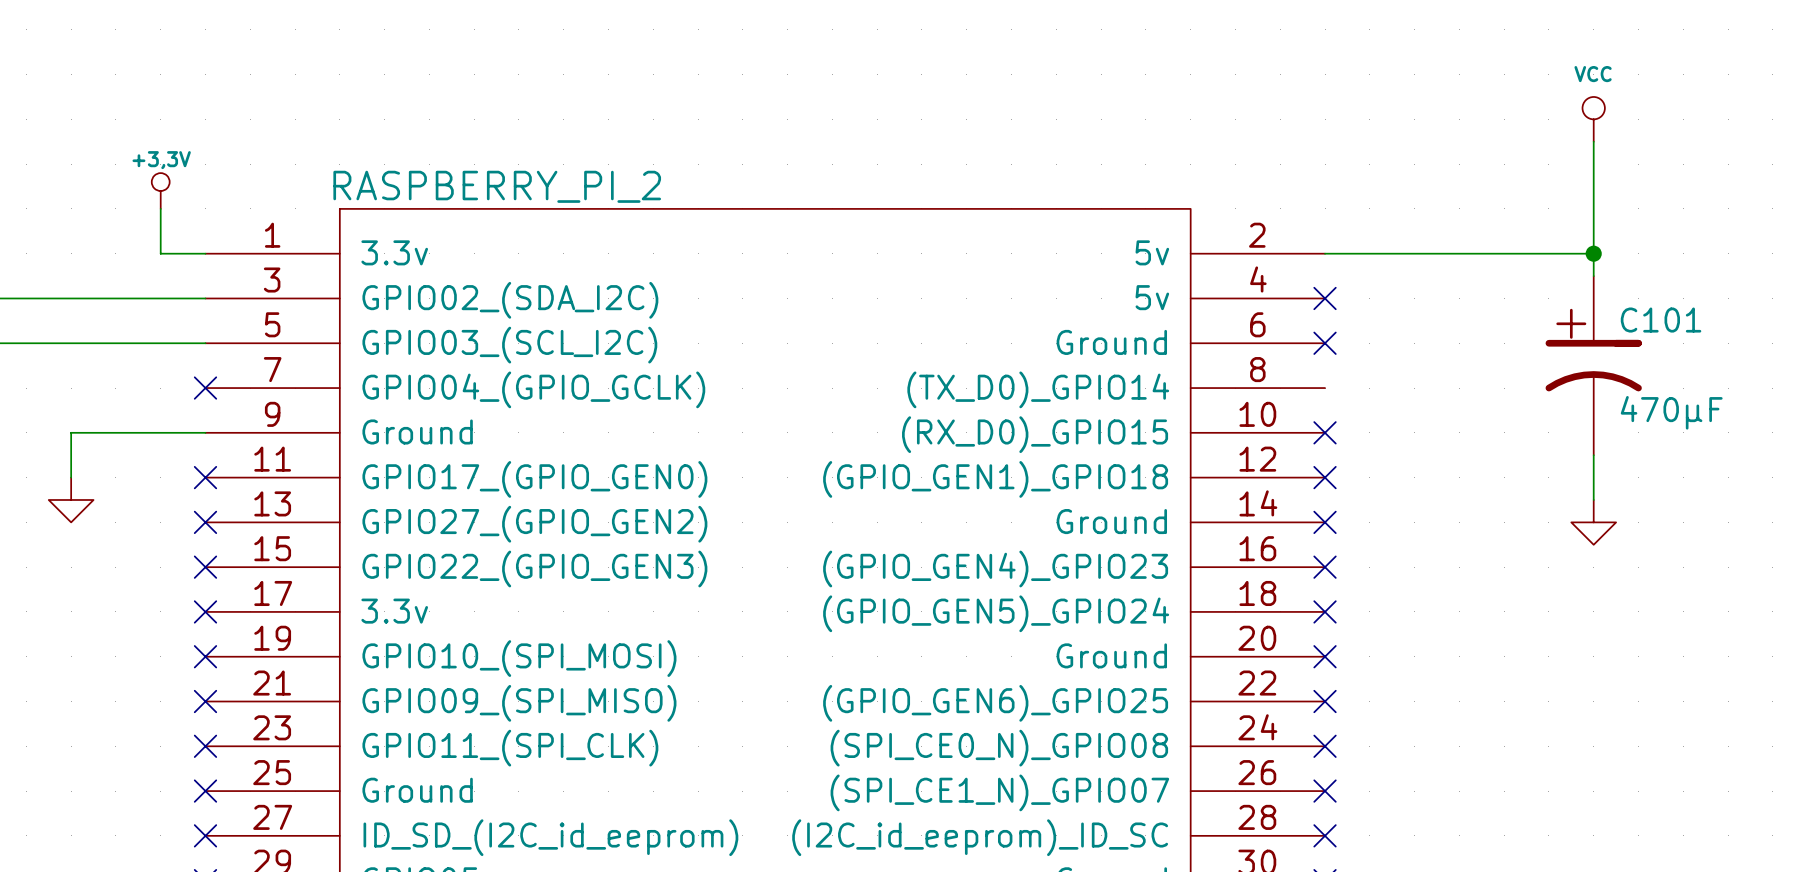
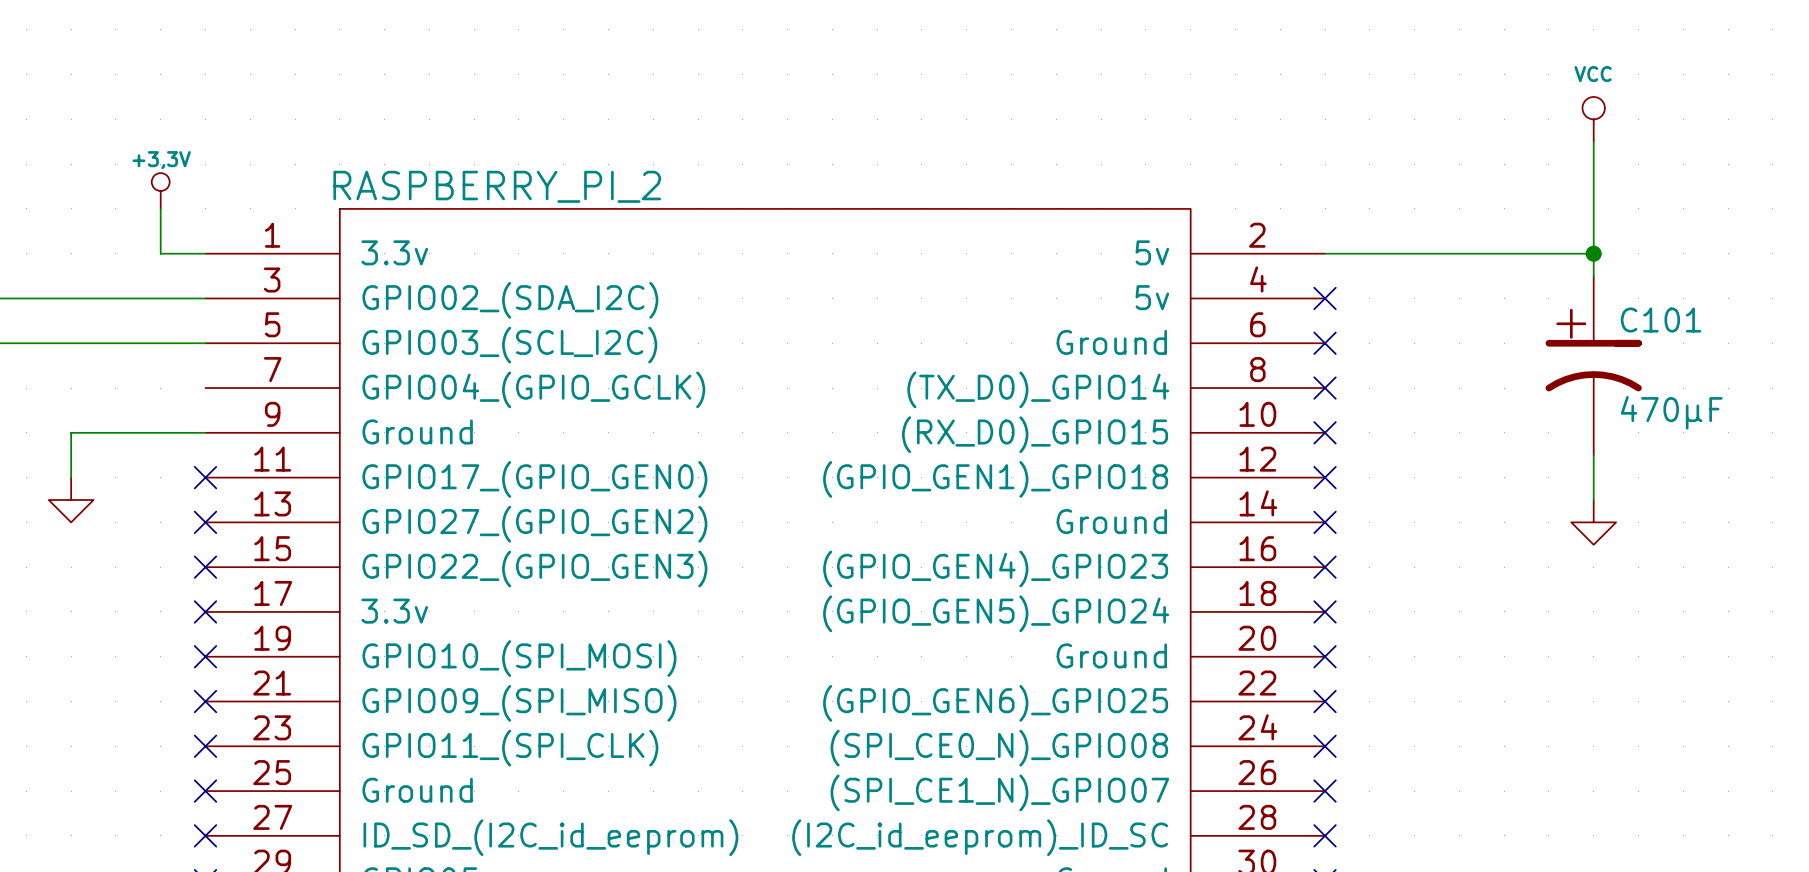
no-connect mark: (205, 388) -> none
no-connect mark: none -> (1325, 388)

